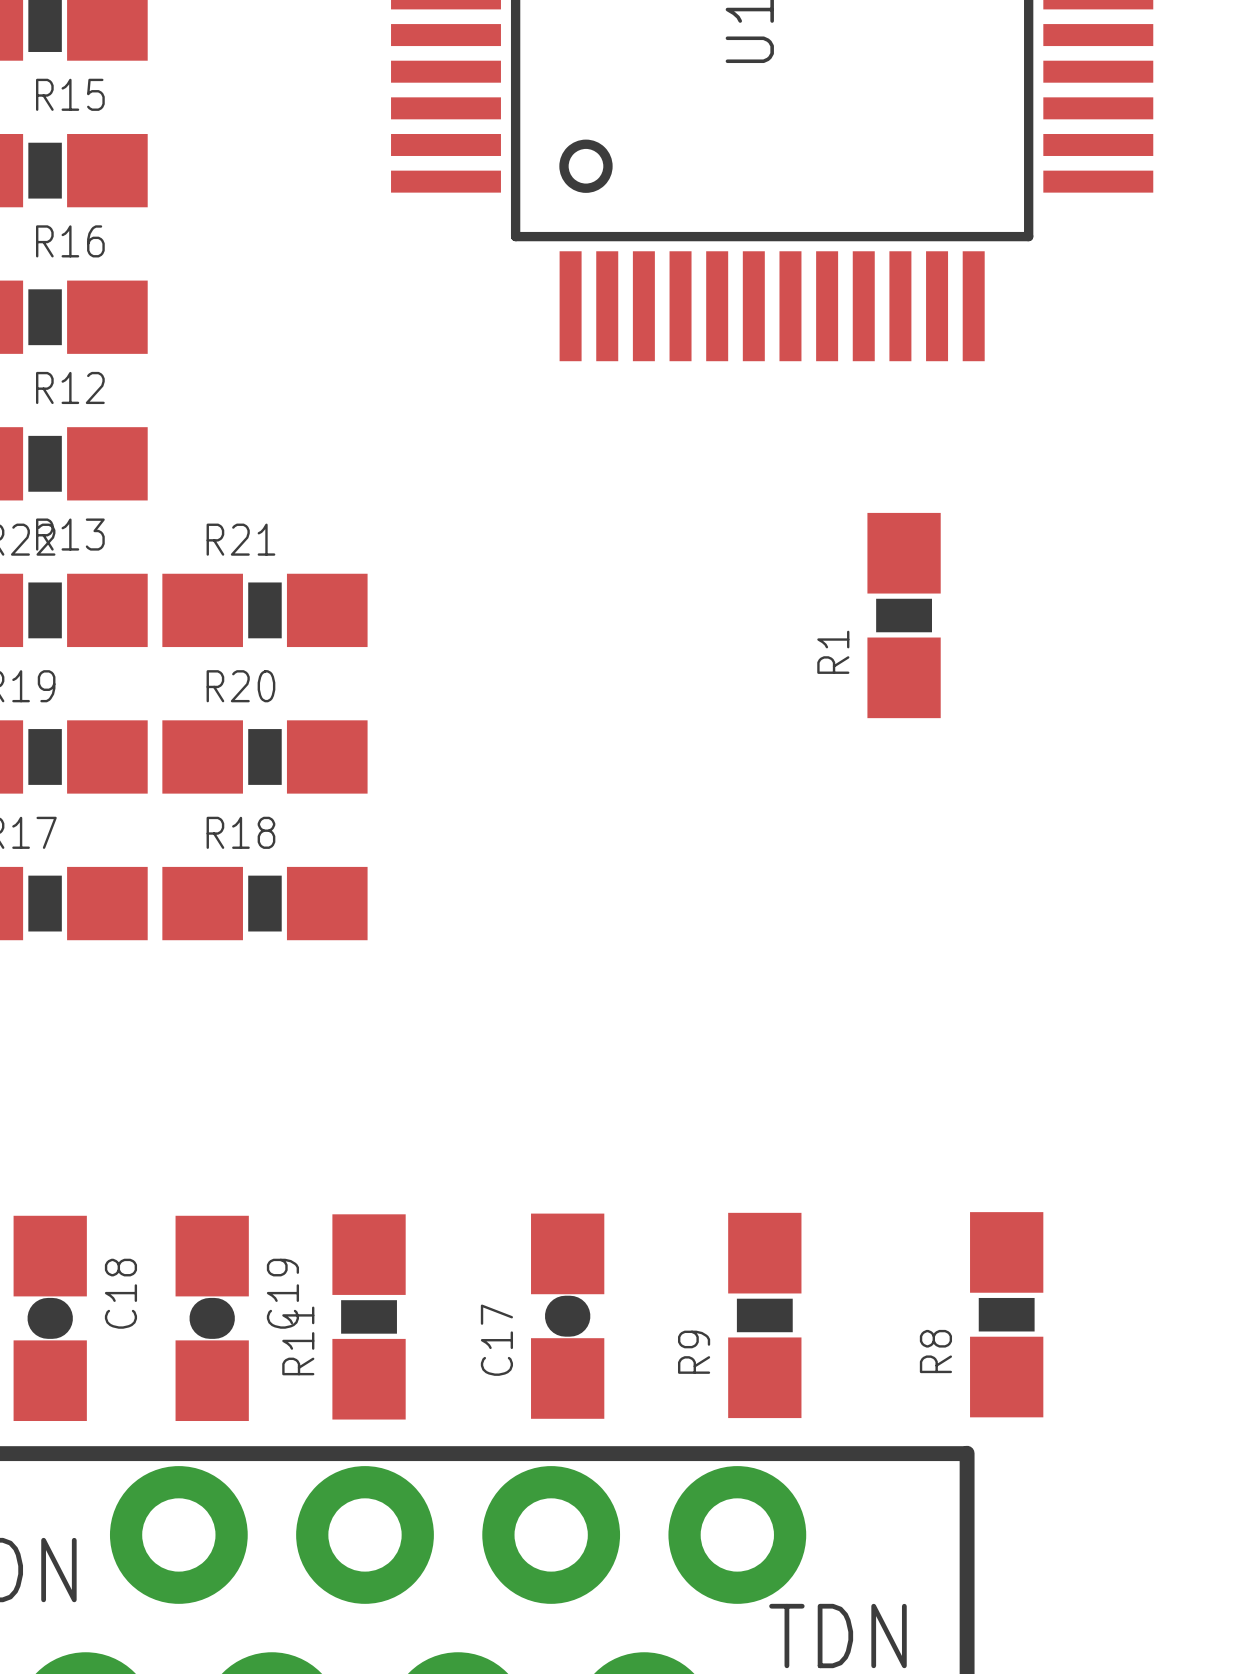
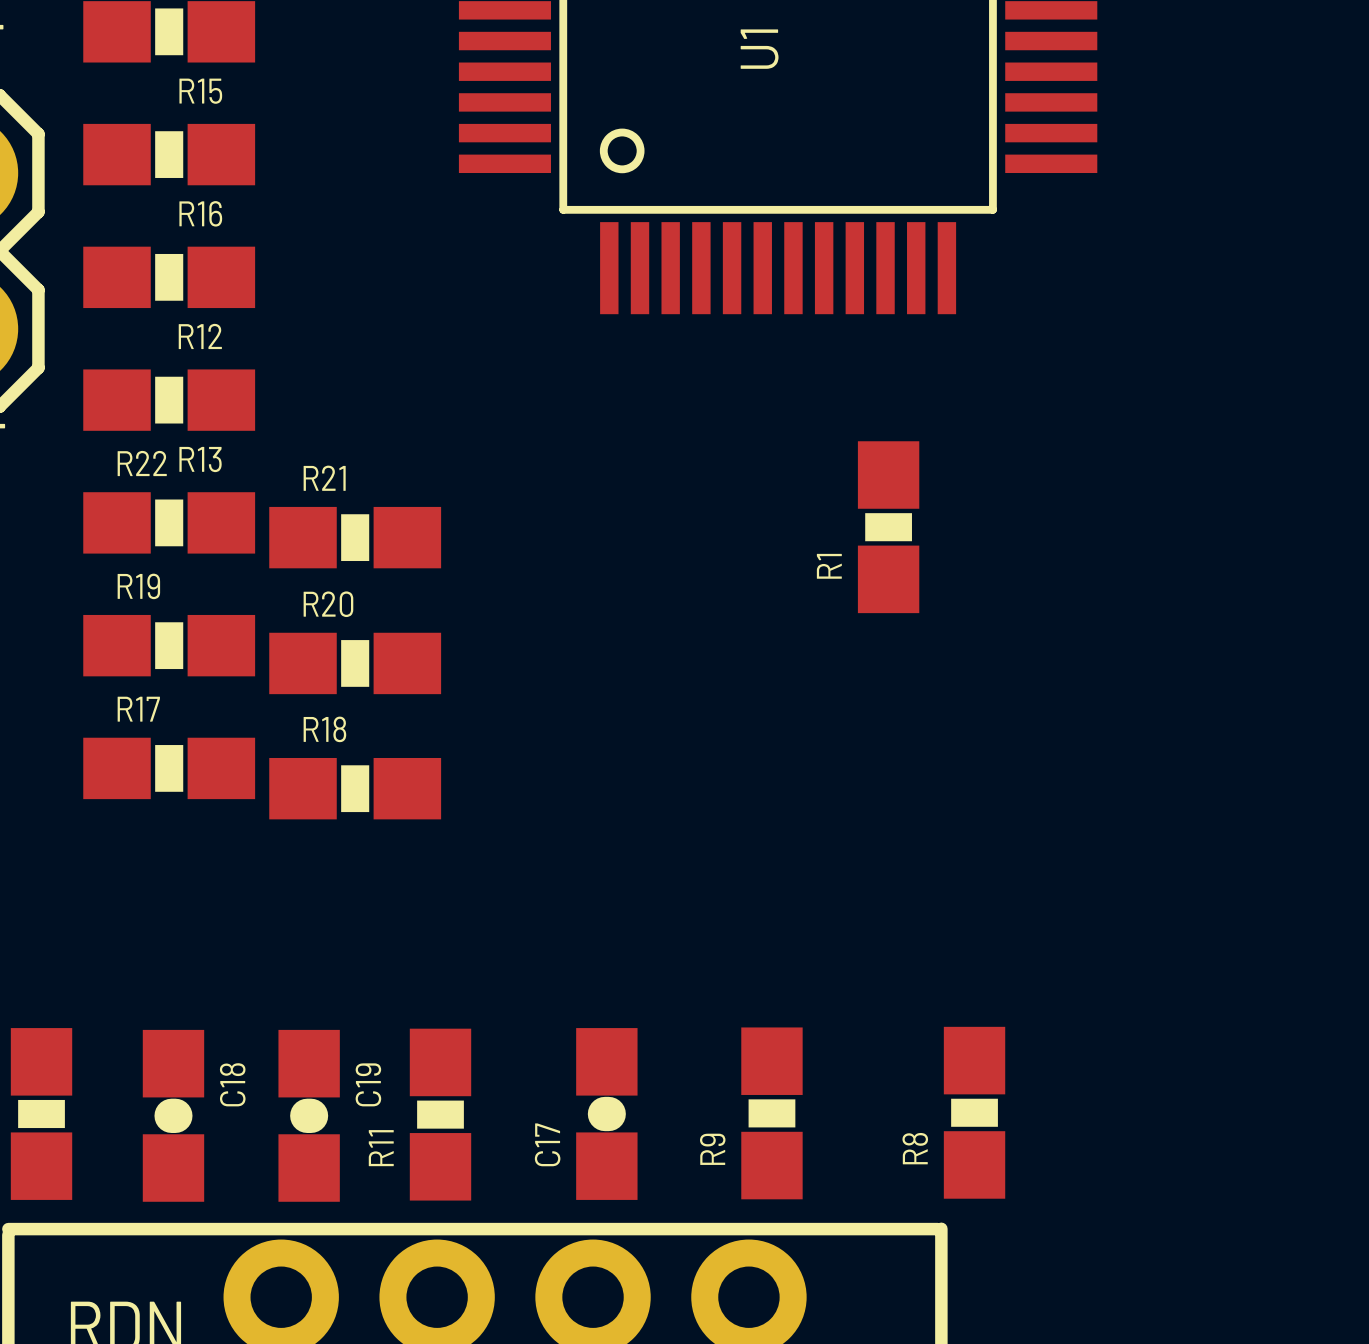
R21 position: (264, 610) -> (355, 537)
R20 position: (264, 756) -> (355, 663)
R18 position: (264, 903) -> (355, 788)

